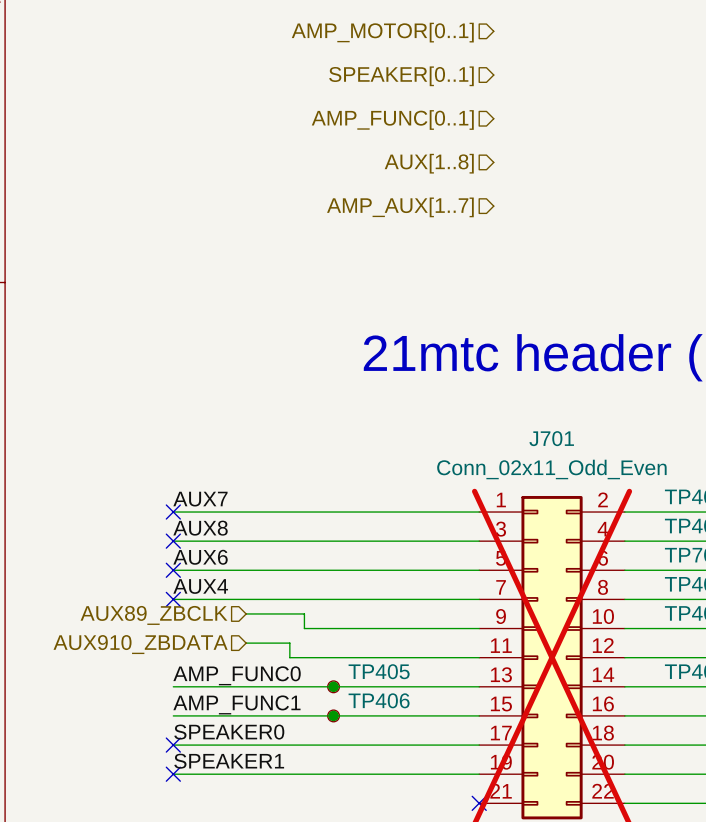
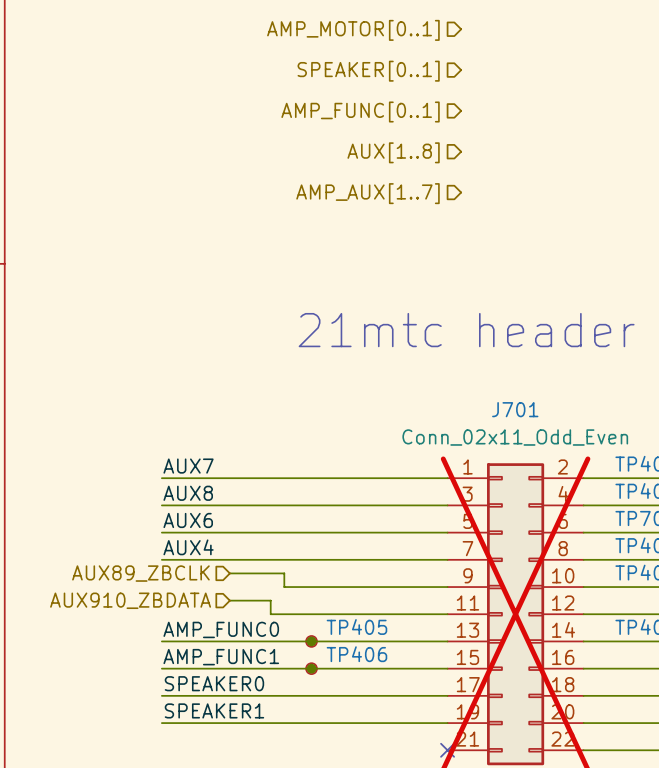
no-connect mark: (173, 512) -> none
no-connect mark: (173, 541) -> none
no-connect mark: (173, 570) -> none
no-connect mark: (173, 599) -> none
no-connect mark: (173, 745) -> none
no-connect mark: (173, 774) -> none

